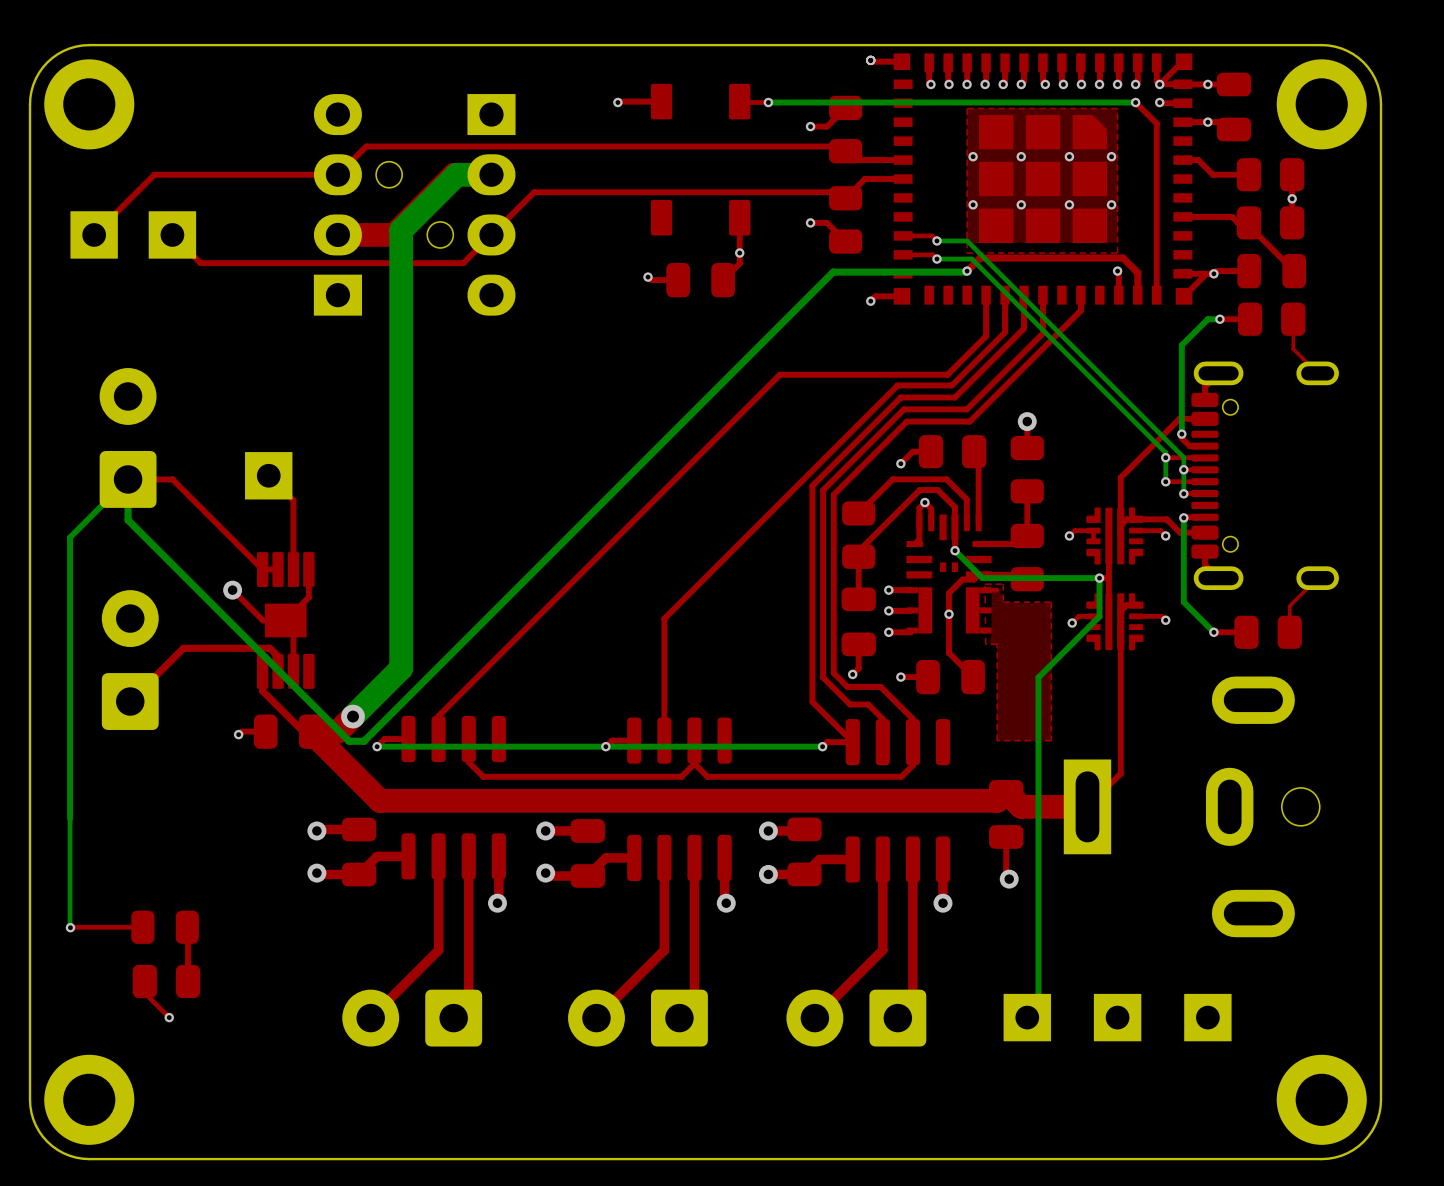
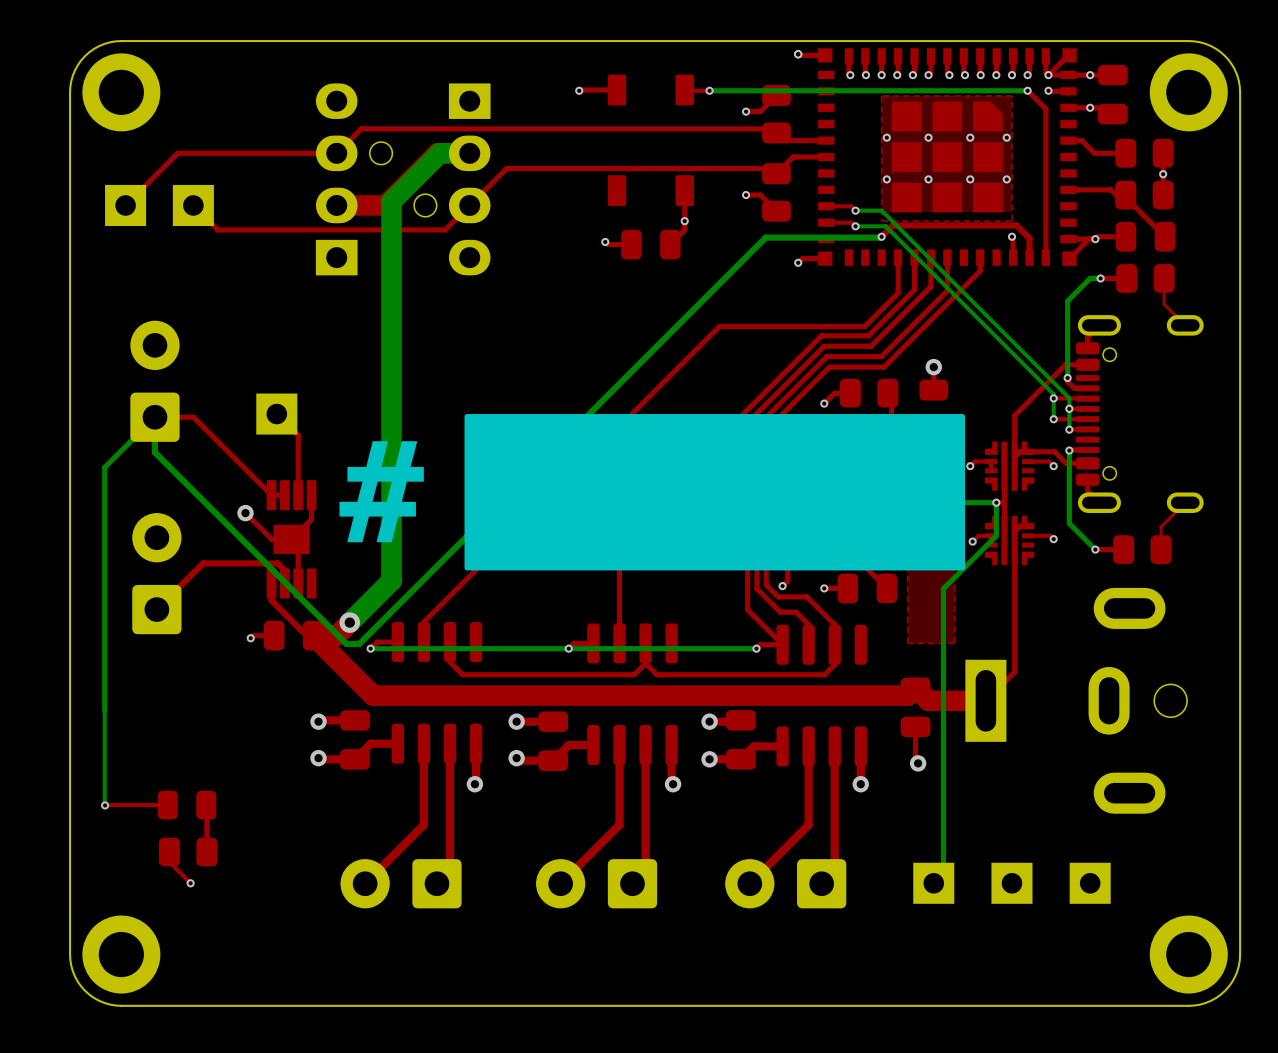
drawing: none -> [464, 414, 966, 571]
text: none -> # (381, 491)

